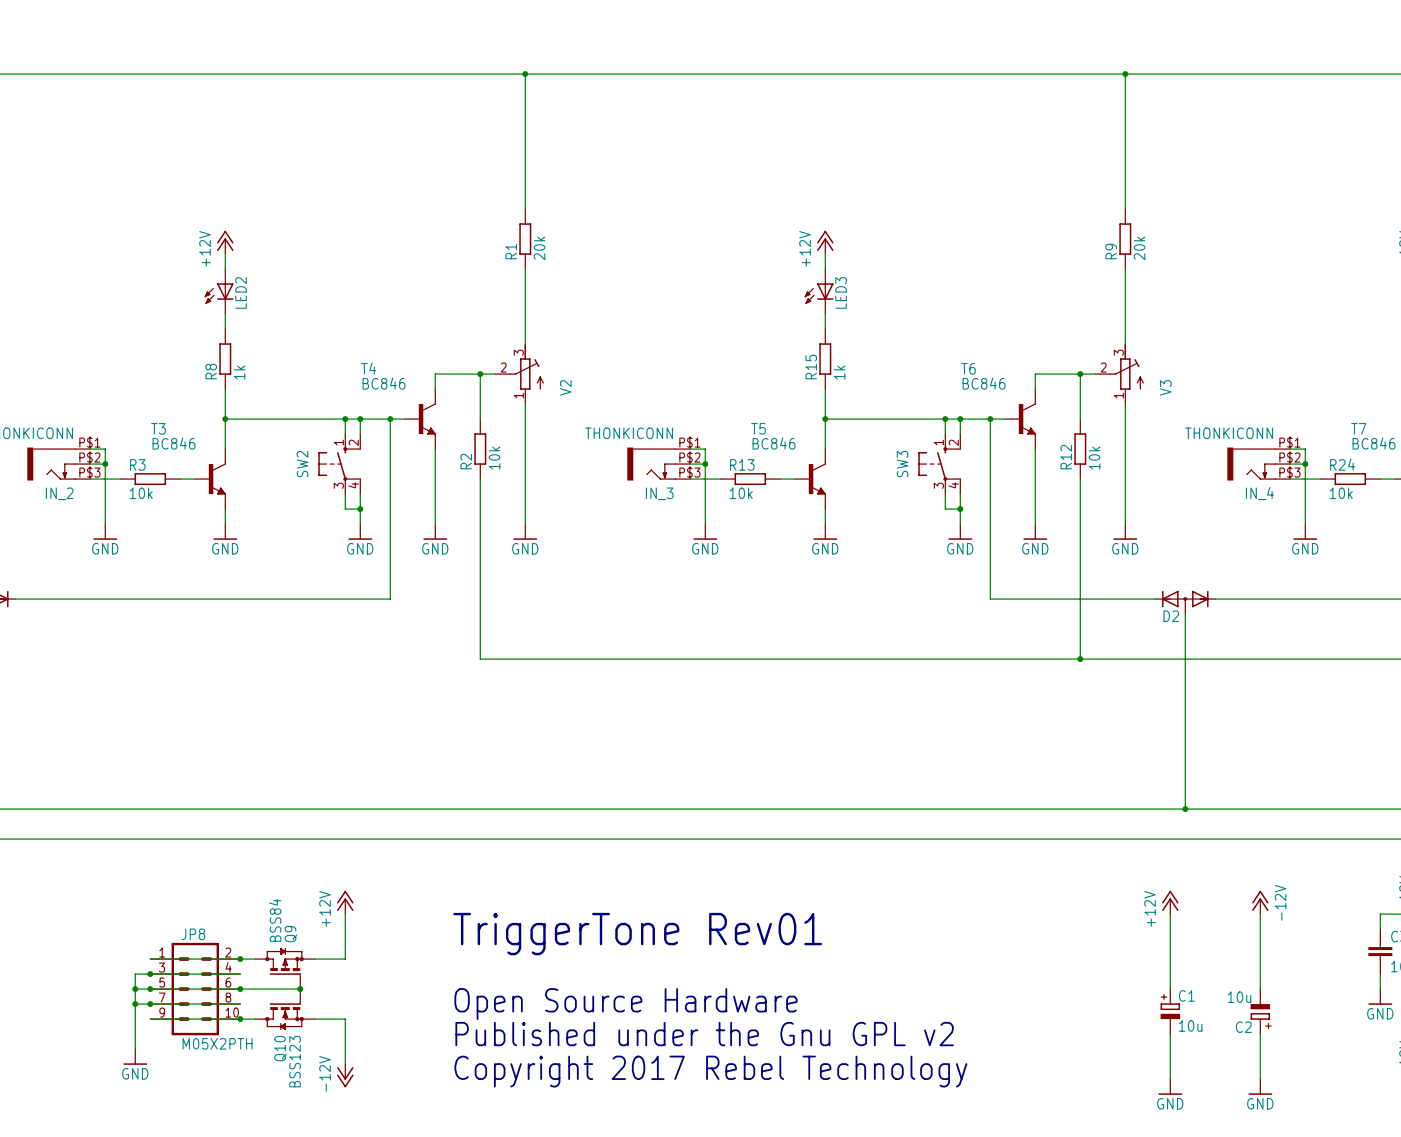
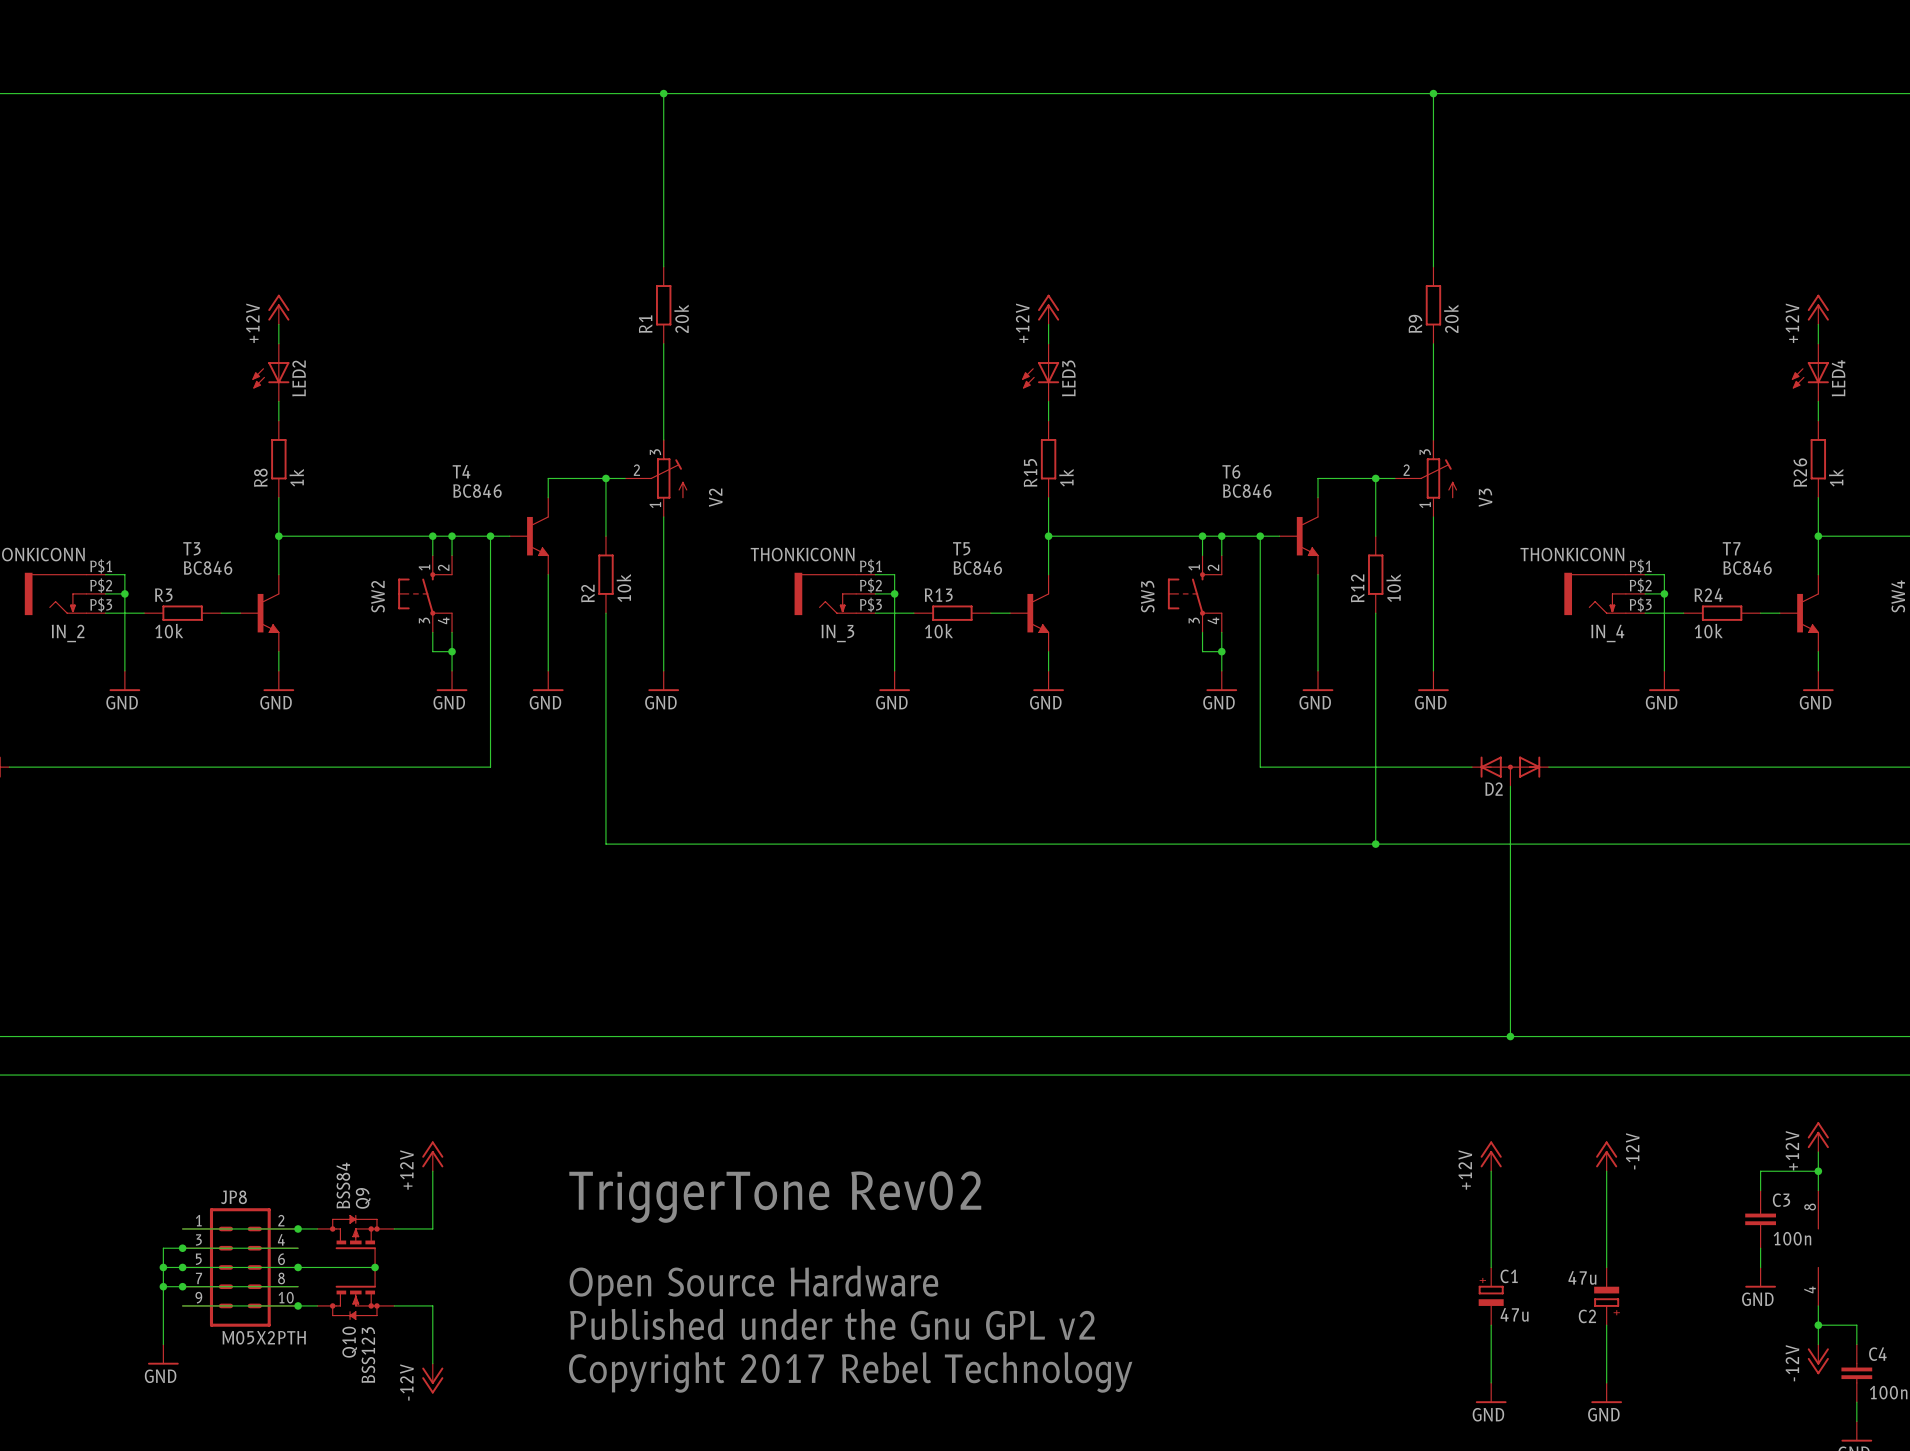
text: TriggerTone Rev01 (637, 934) -> TriggerTone Rev02 (775, 1197)
C2 value: 10u (1239, 997) -> 47u (1582, 1277)
C1 value: 10u (1190, 1025) -> 47u (1514, 1314)

